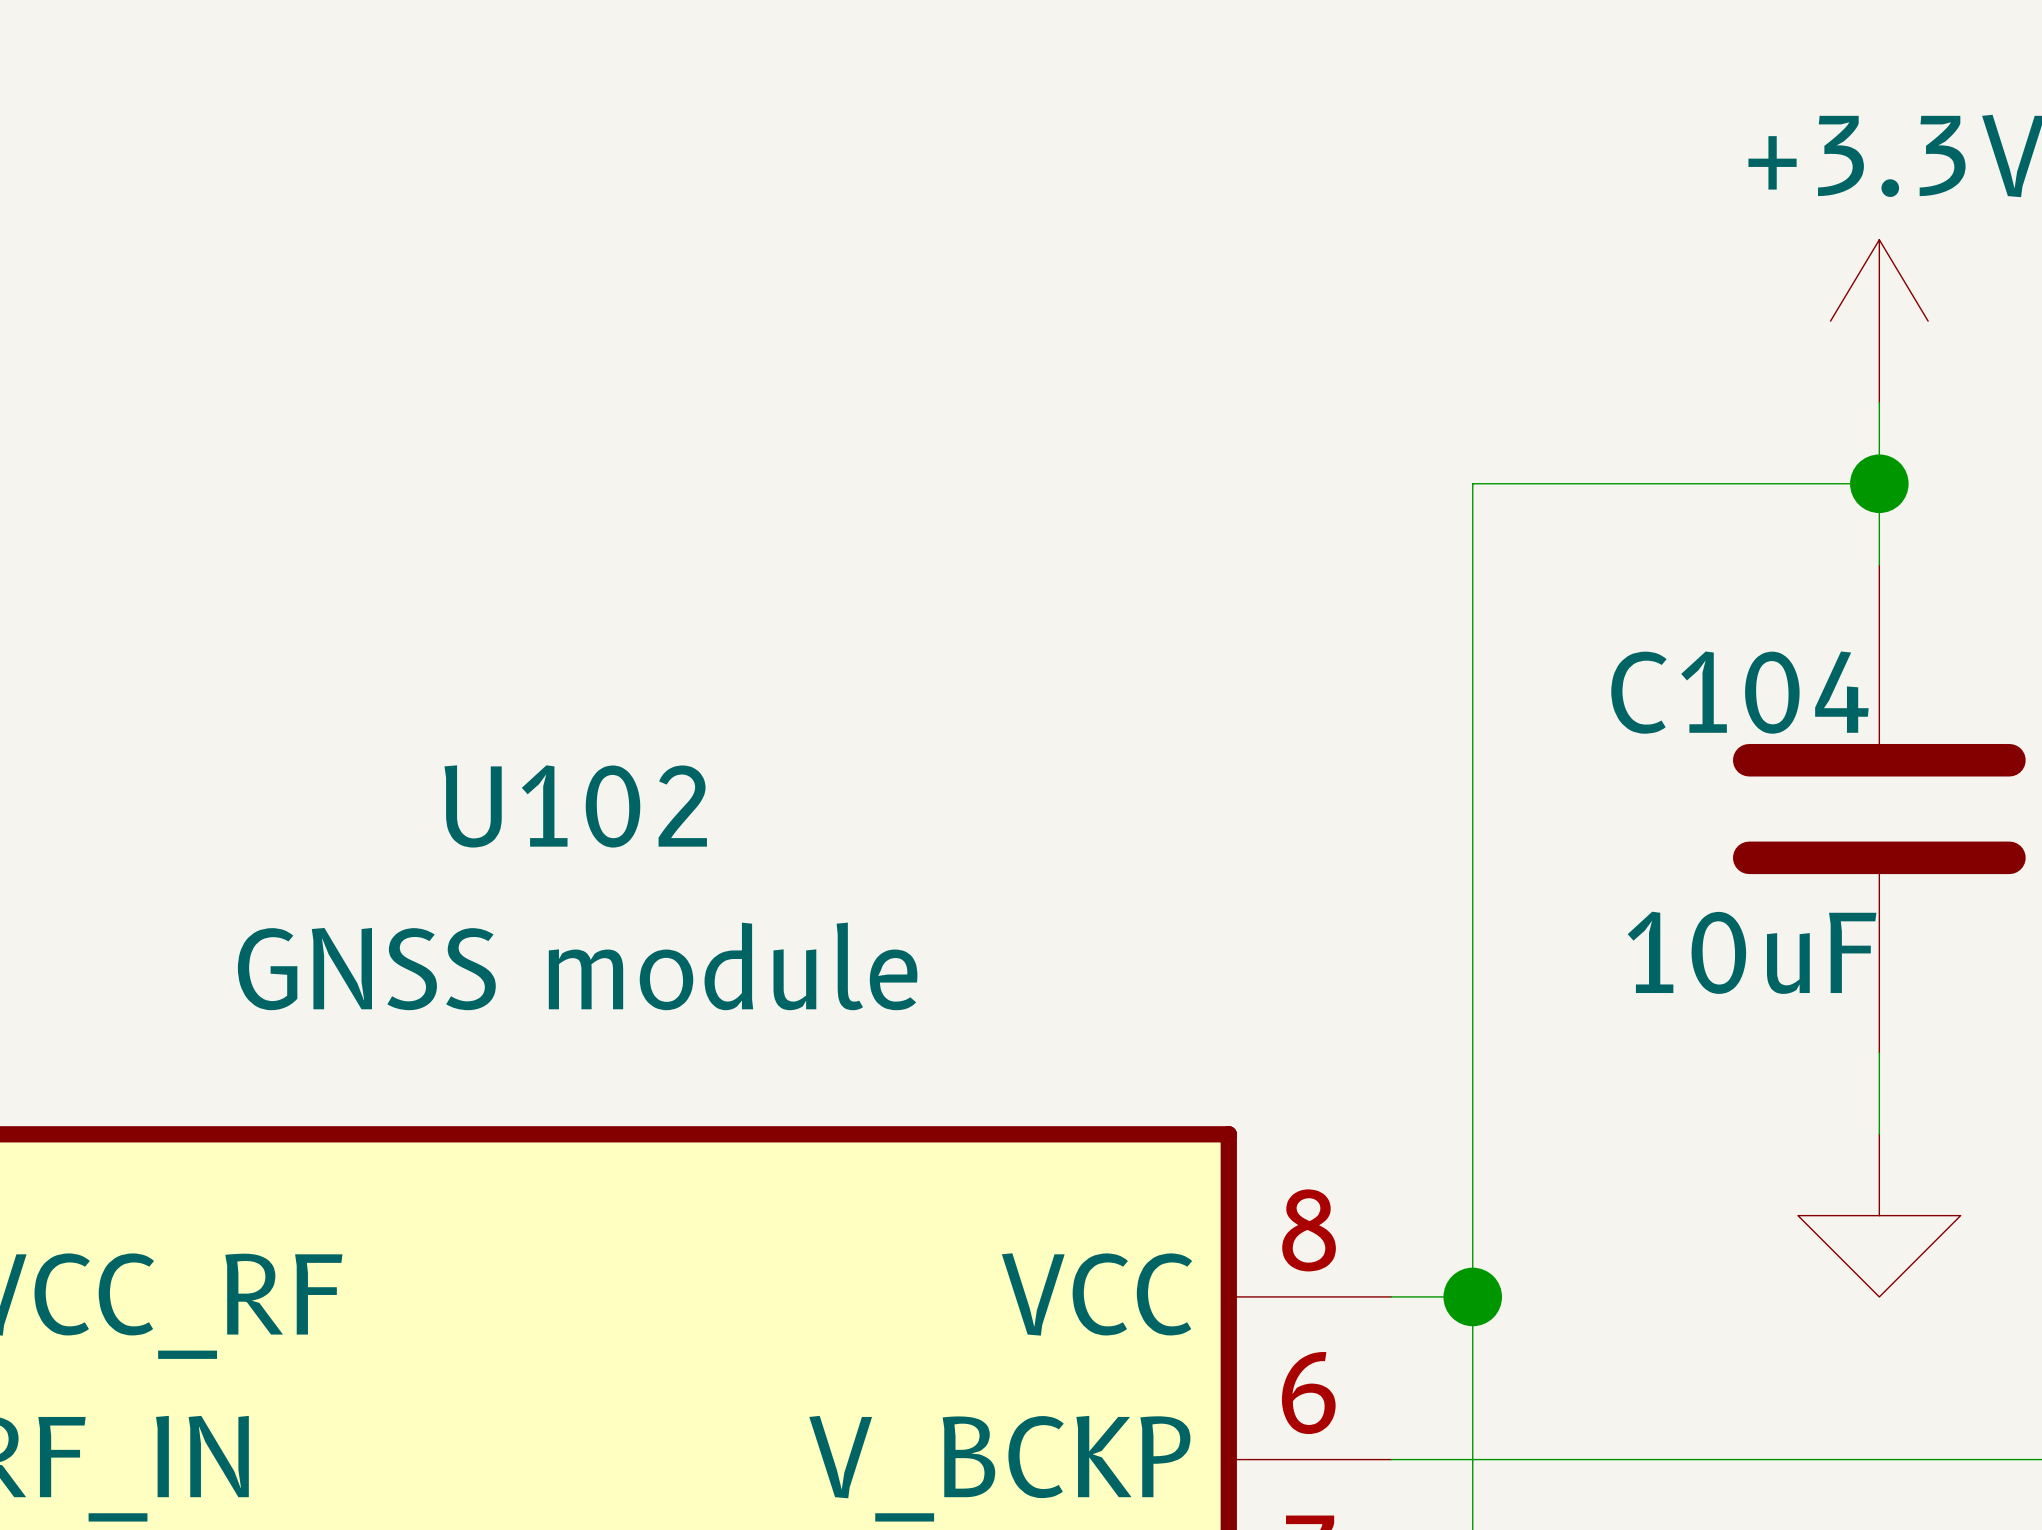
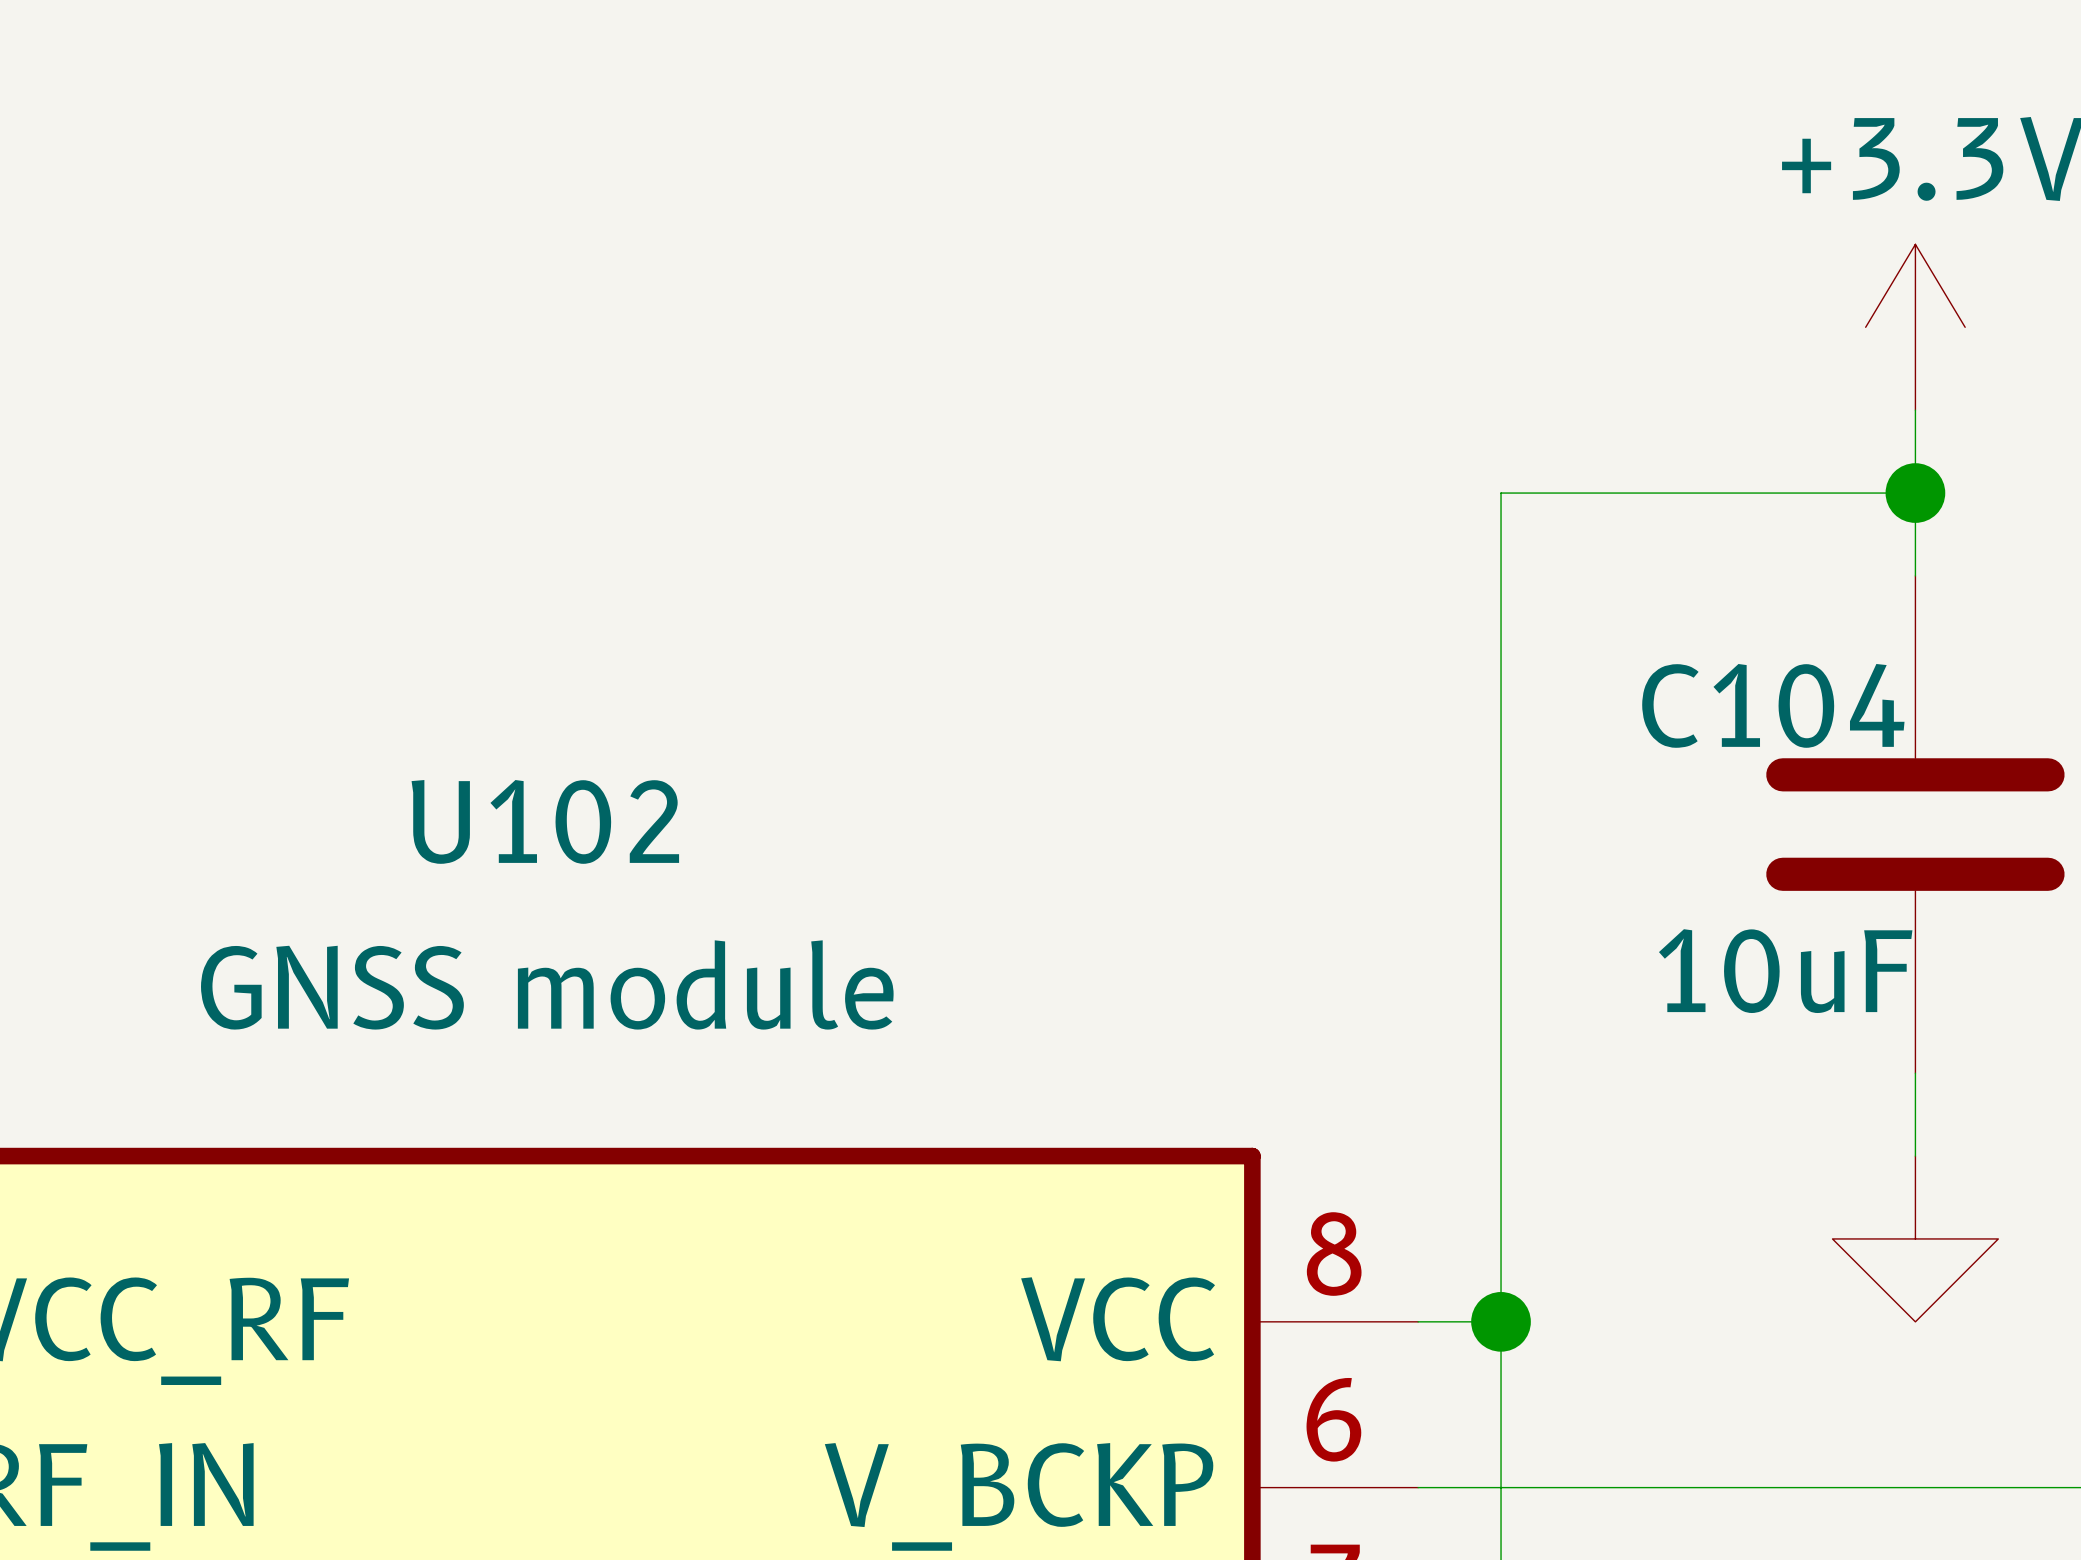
U102 name position: U102 (575, 806) -> U102 (545, 821)
U102 value position: GNSS module (577, 966) -> GNSS module (547, 984)

